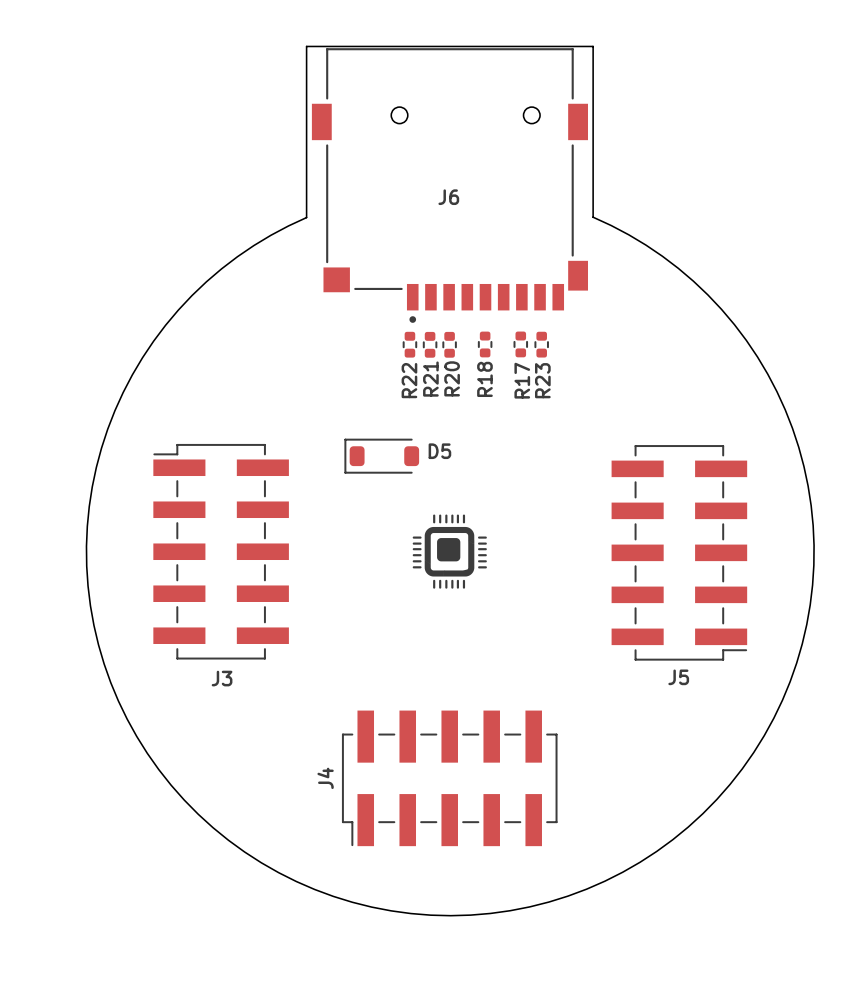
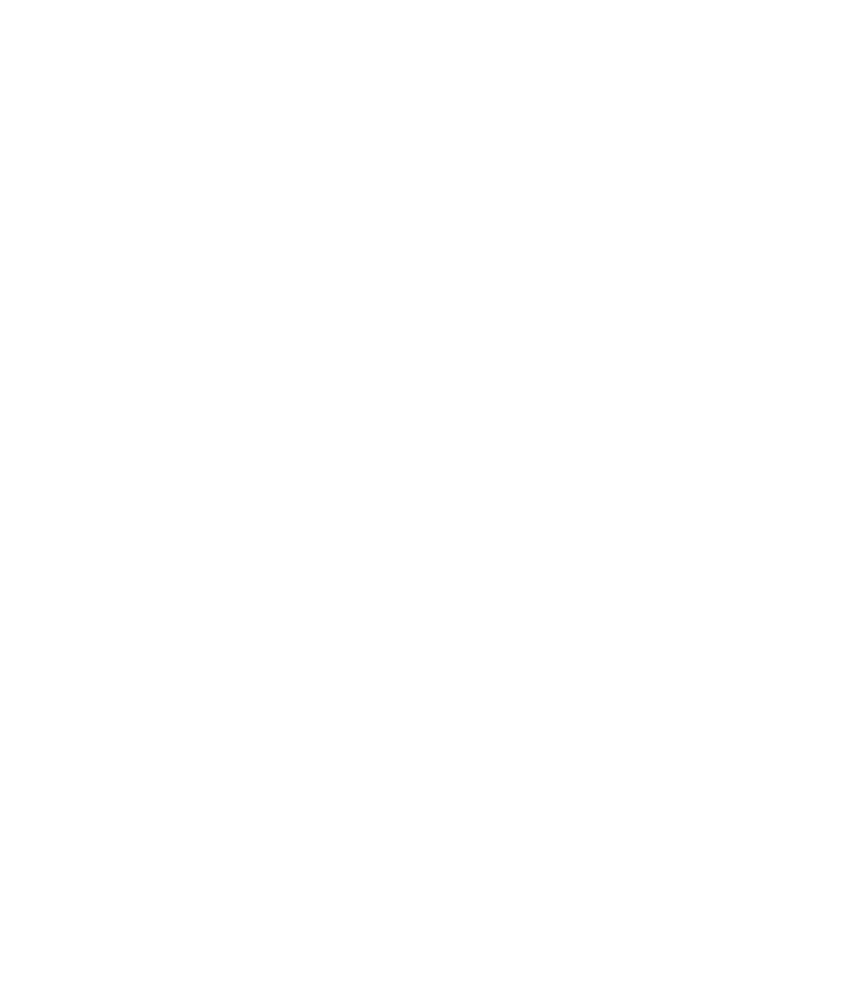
board edge: (306, 46) (306, 217) (253, 245) (221, 268) (192, 295) (165, 325) (142, 357) (123, 392) (107, 429) (92, 486) (86, 546) (90, 605) (98, 644) (110, 682) (127, 718) (158, 769) (184, 800) (213, 827) (244, 851) (278, 872) (314, 889) (352, 902) (410, 913) (470, 915) (510, 910) (549, 902) (586, 889) (622, 872) (672, 839) (716, 799) (742, 768) (764, 735) (790, 681) (802, 643) (810, 604) (813, 565) (813, 525) (808, 485) (798, 447) (785, 409) (767, 374) (746, 340) (721, 309) (693, 281) (662, 256) (628, 234) (593, 217) (593, 46) (306, 46) -> none
J6: (449, 185) -> none
R22: (409, 344) -> none
R21: (430, 344) -> none
R20: (449, 344) -> none
R18: (485, 344) -> none
R17: (520, 344) -> none
R23: (541, 344) -> none
D5: (381, 456) -> none
drawing: [412, 514, 487, 589] -> none
J3: (221, 551) -> none
J5: (679, 552) -> none
J4: (449, 778) -> none

